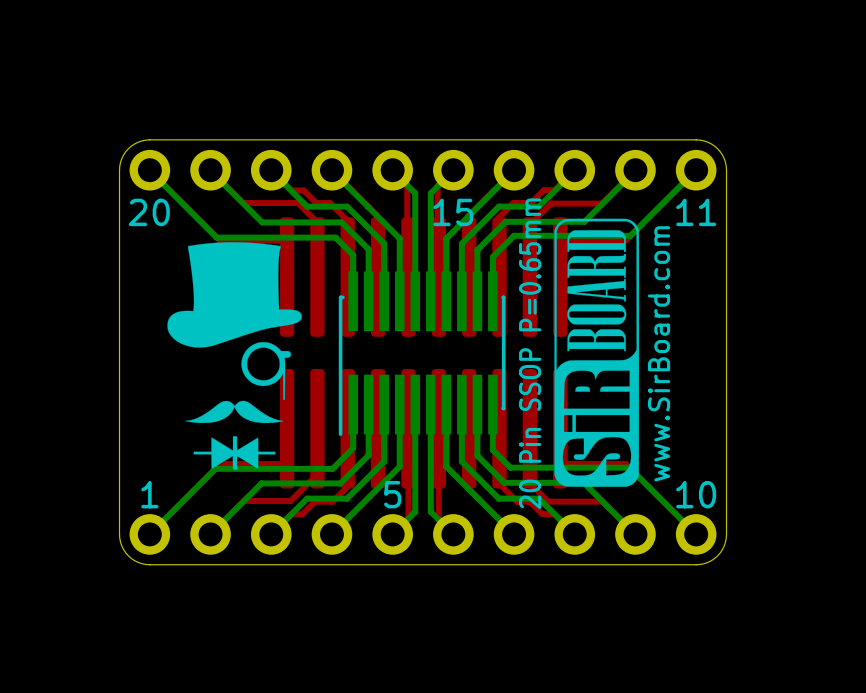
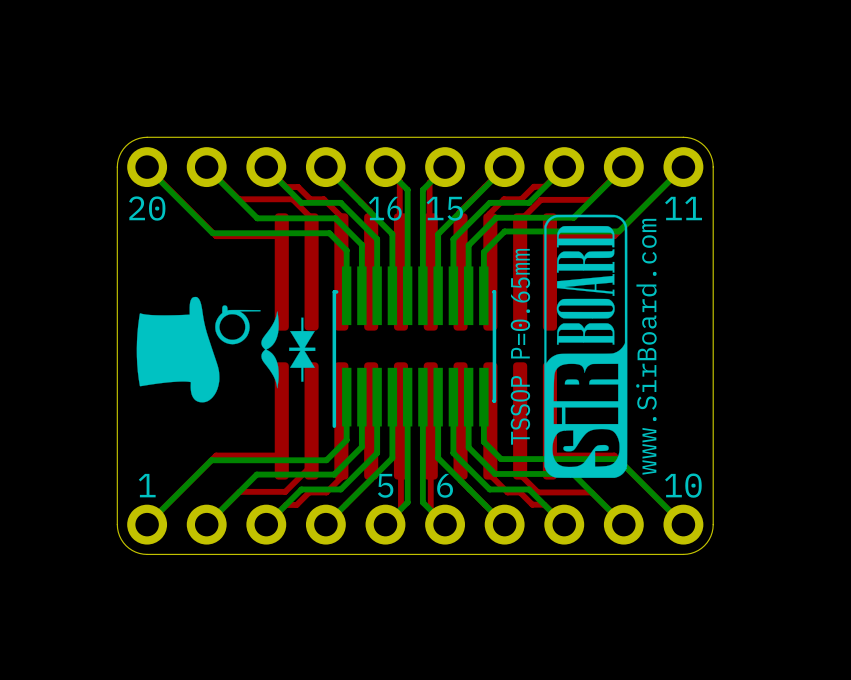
text: none -> 16 (385, 208)
drawing shape: [167, 242, 302, 470] -> [136, 296, 316, 403]
text: 20 Pin SSOP P=0.65mm (530, 353) -> TSSOP P=0.65mm (520, 346)
text: none -> 6 (445, 485)

